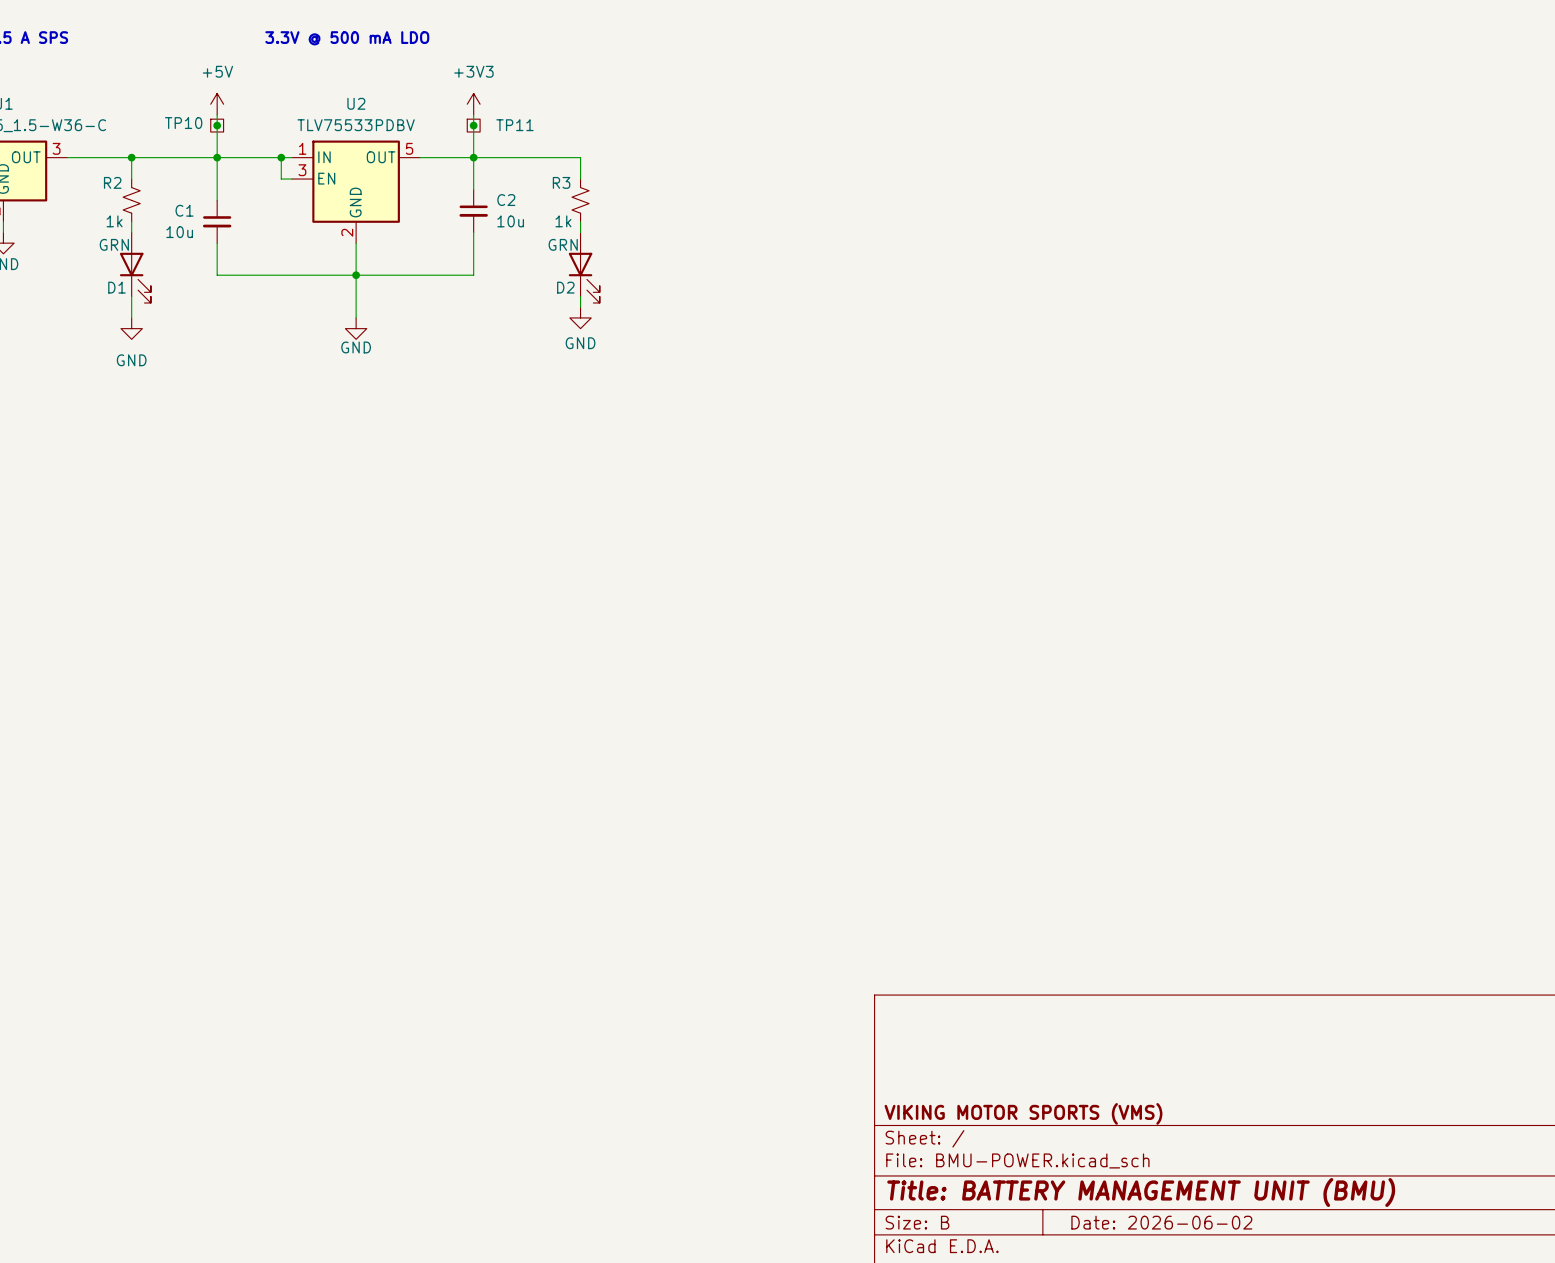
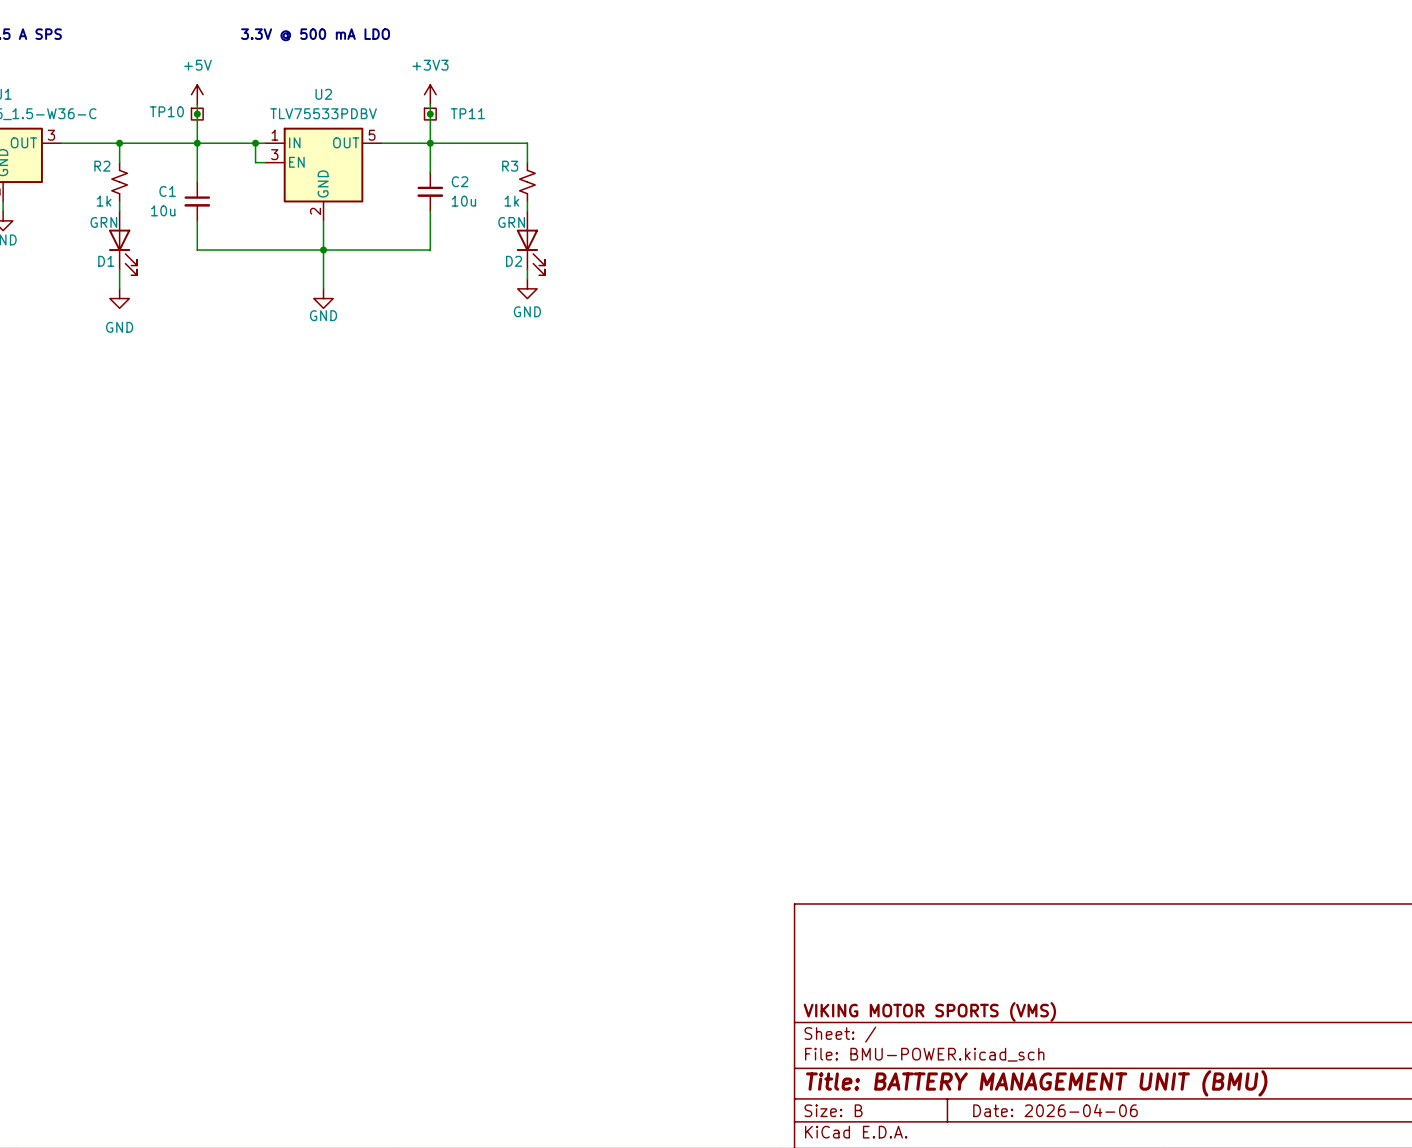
title block: Date: 2026-06-02 (1161, 1222) -> Date: 2026-04-06 (1055, 1110)

